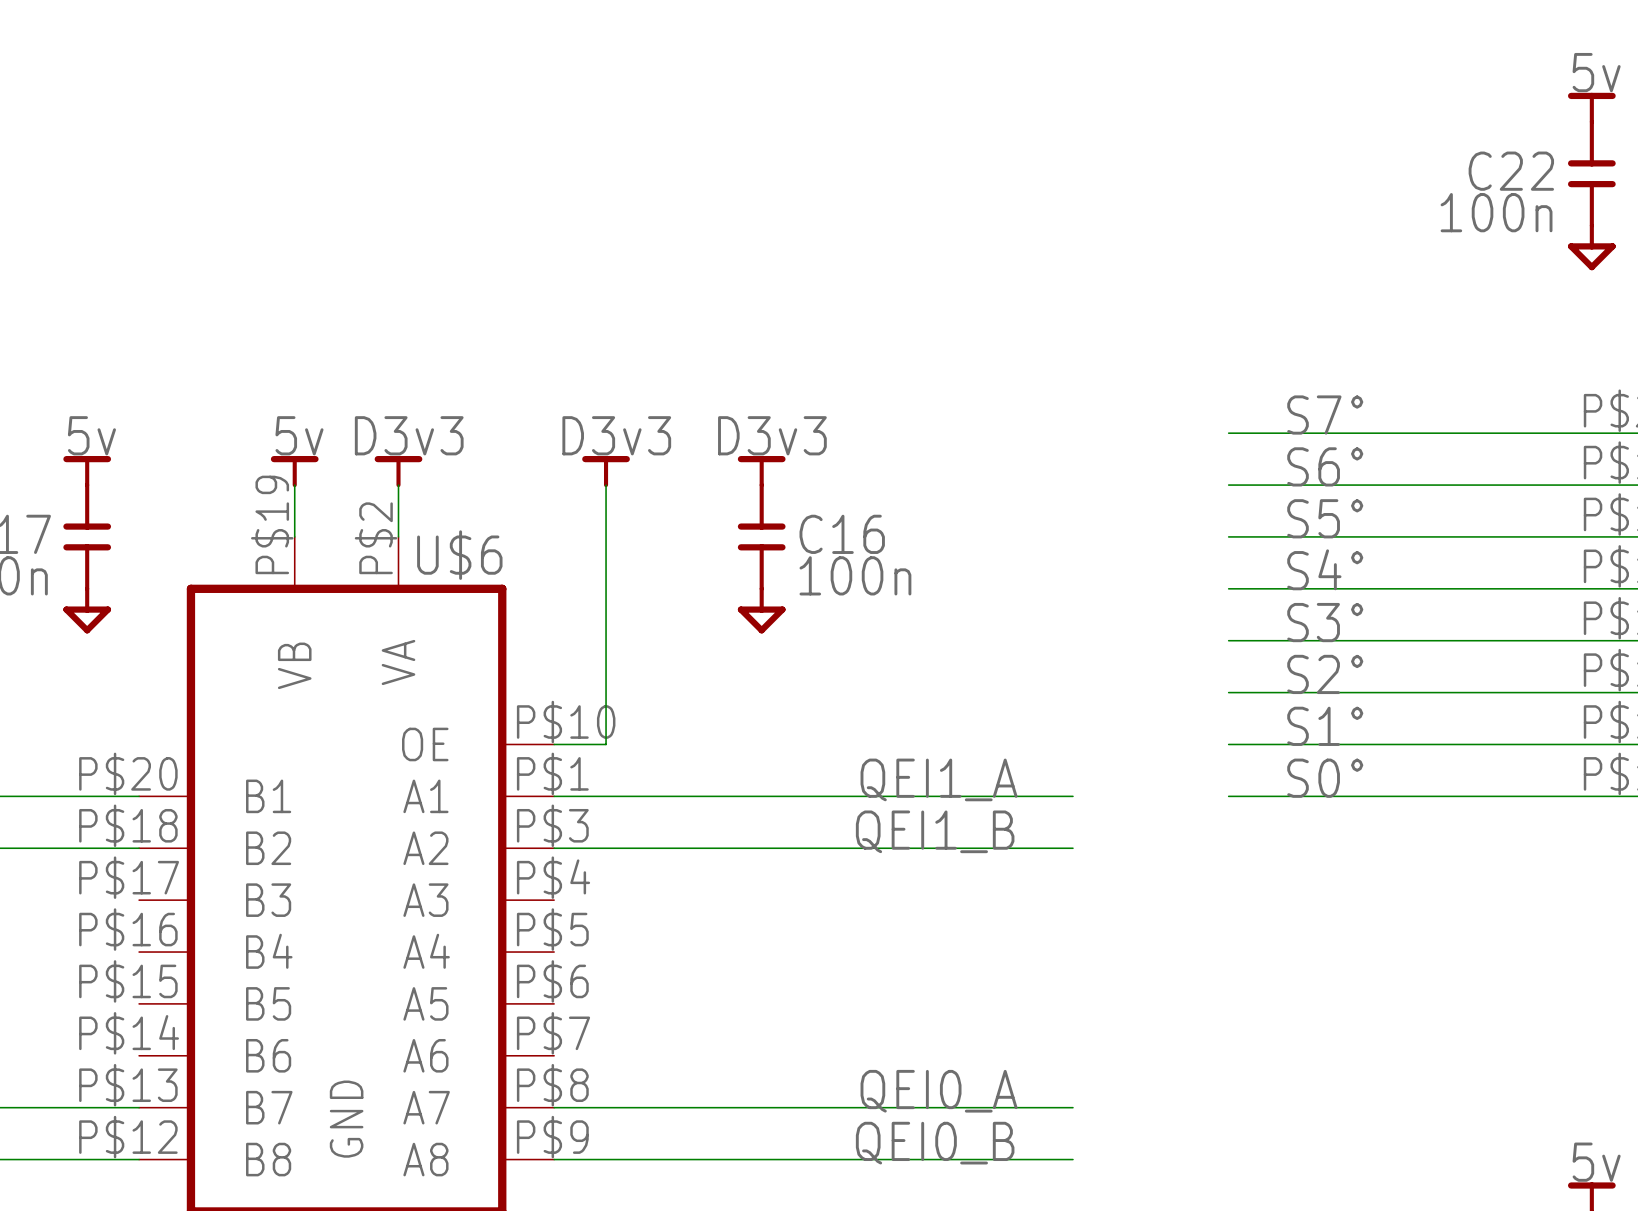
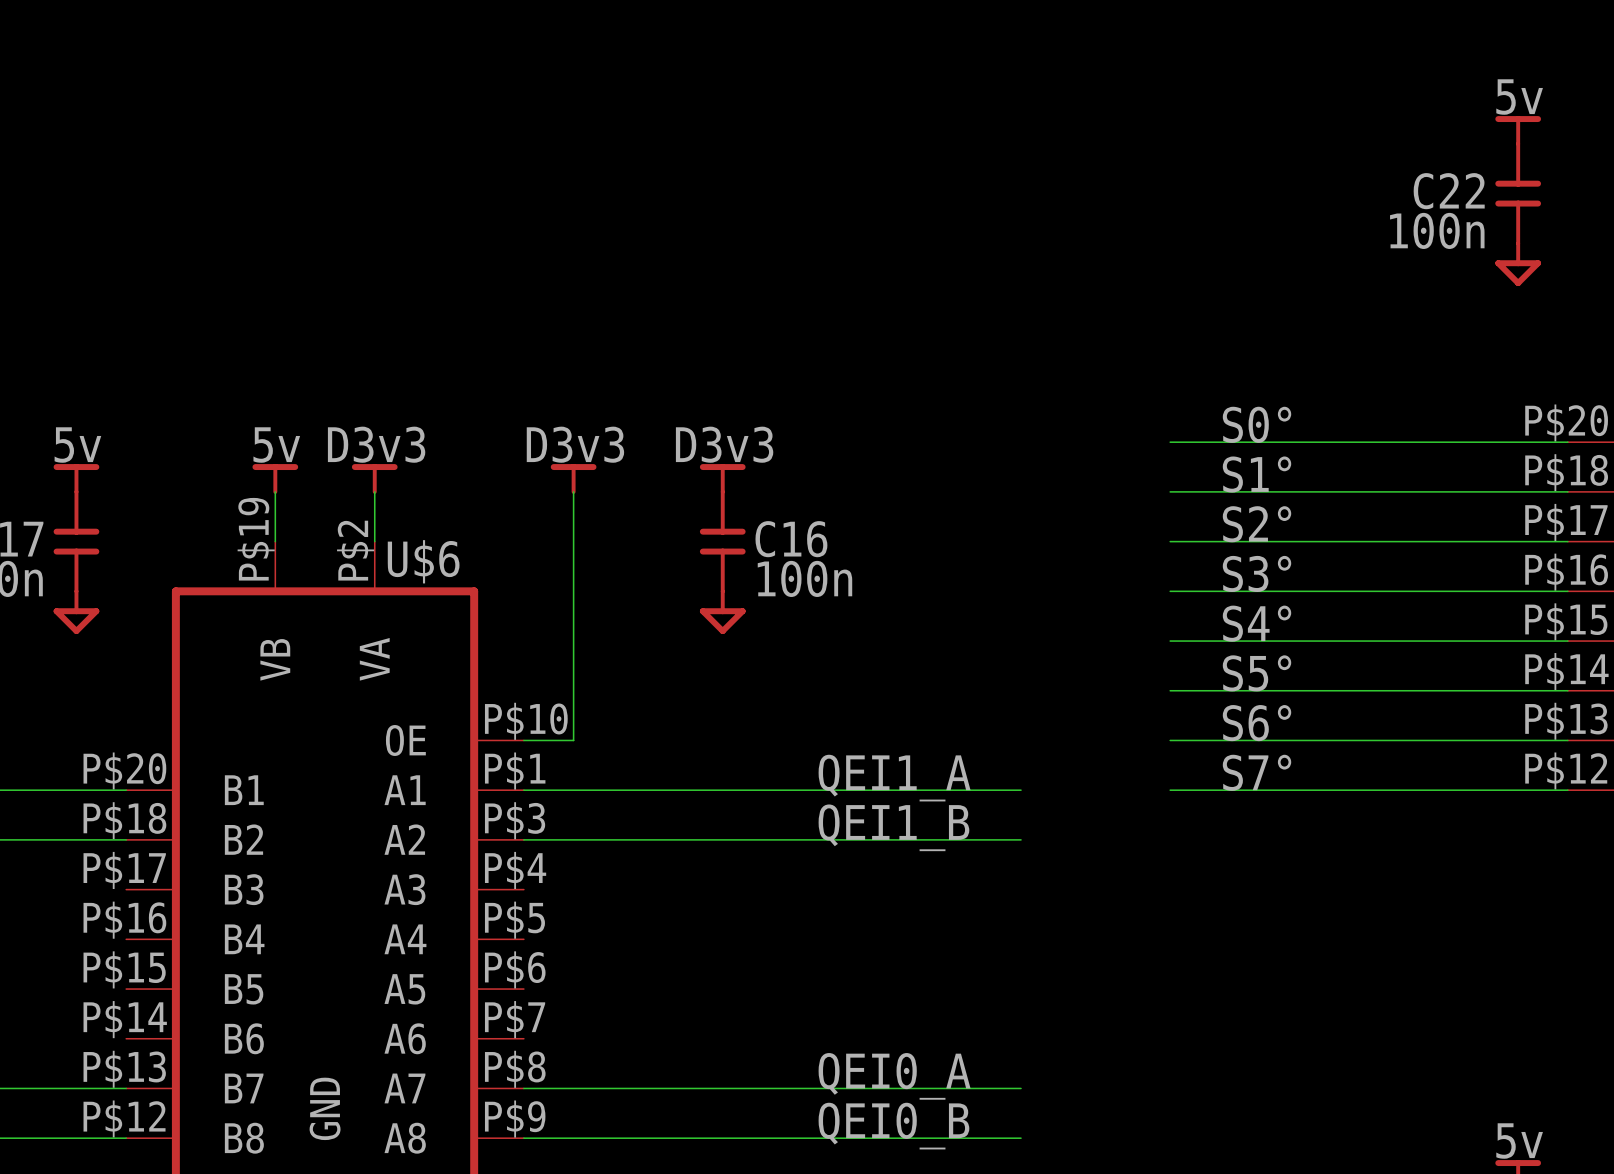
label: S7° (1325, 415) -> S0° (1257, 424)
label: S6° (1325, 466) -> S1° (1257, 474)
label: S5° (1325, 518) -> S2° (1257, 524)
label: S4° (1325, 569) -> S3° (1257, 573)
label: S3° (1325, 622) -> S4° (1257, 623)
label: S2° (1325, 674) -> S5° (1257, 673)
label: S1° (1325, 726) -> S6° (1257, 723)
label: S0° (1325, 778) -> S7° (1257, 772)

